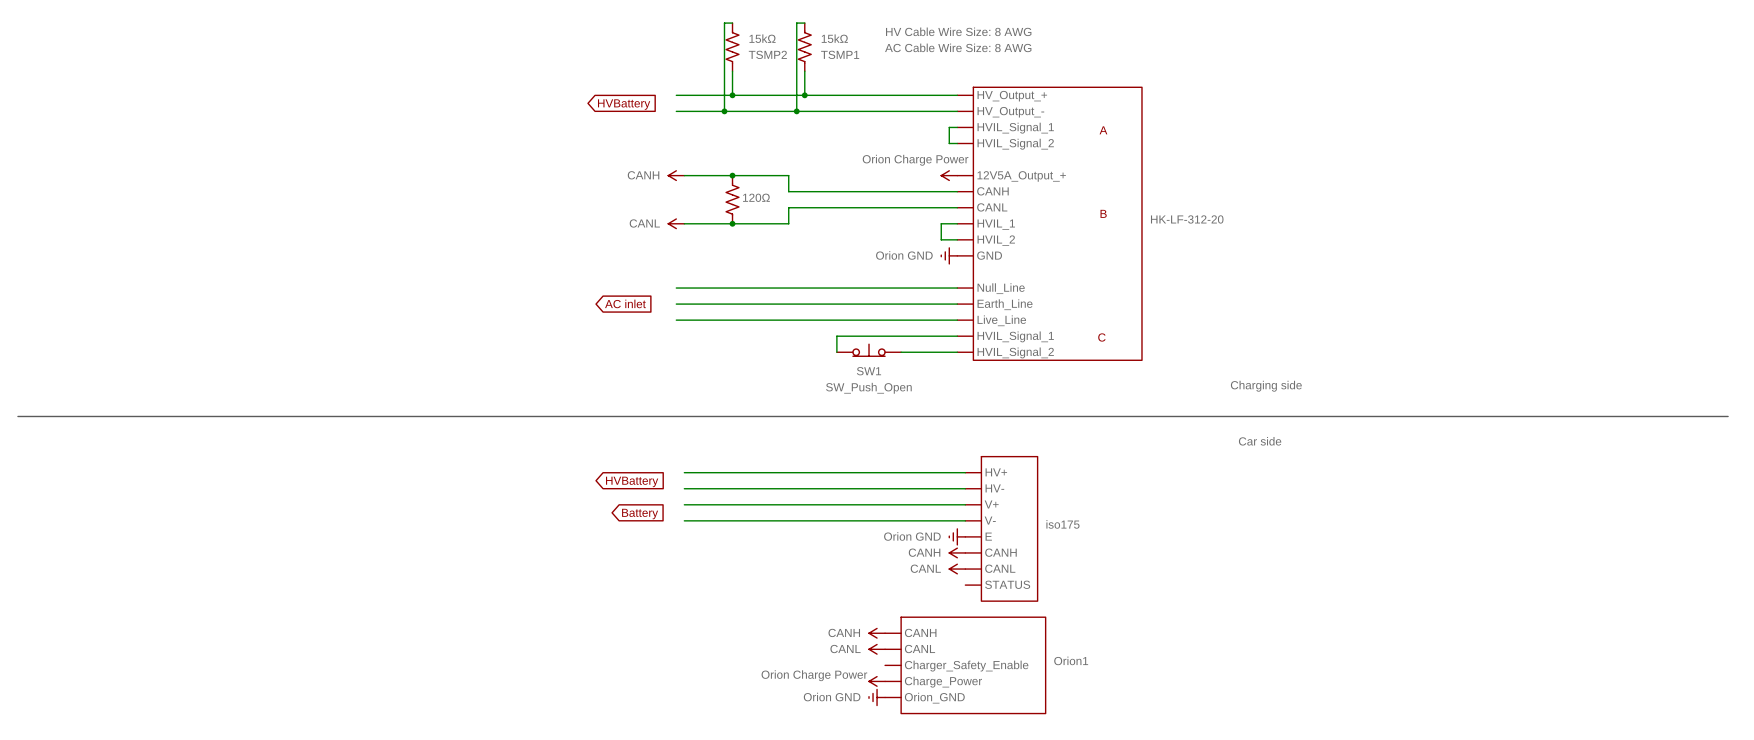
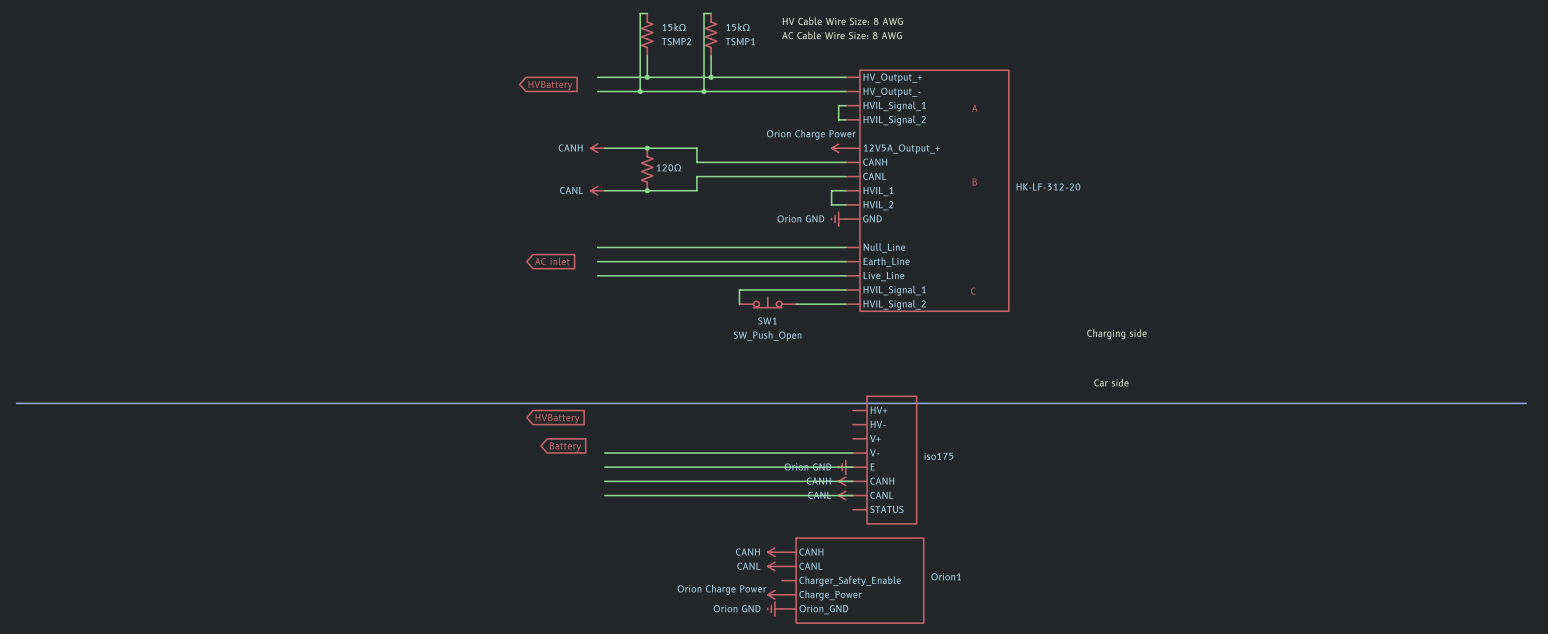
line: (17, 416) (1728, 416) -> (16, 403) (1526, 403)
wire: (684, 472) (965, 472) -> (604, 467) (852, 467)
wire: (684, 488) (965, 488) -> (604, 481) (852, 481)
wire: (684, 504) (965, 504) -> (604, 495) (852, 495)

